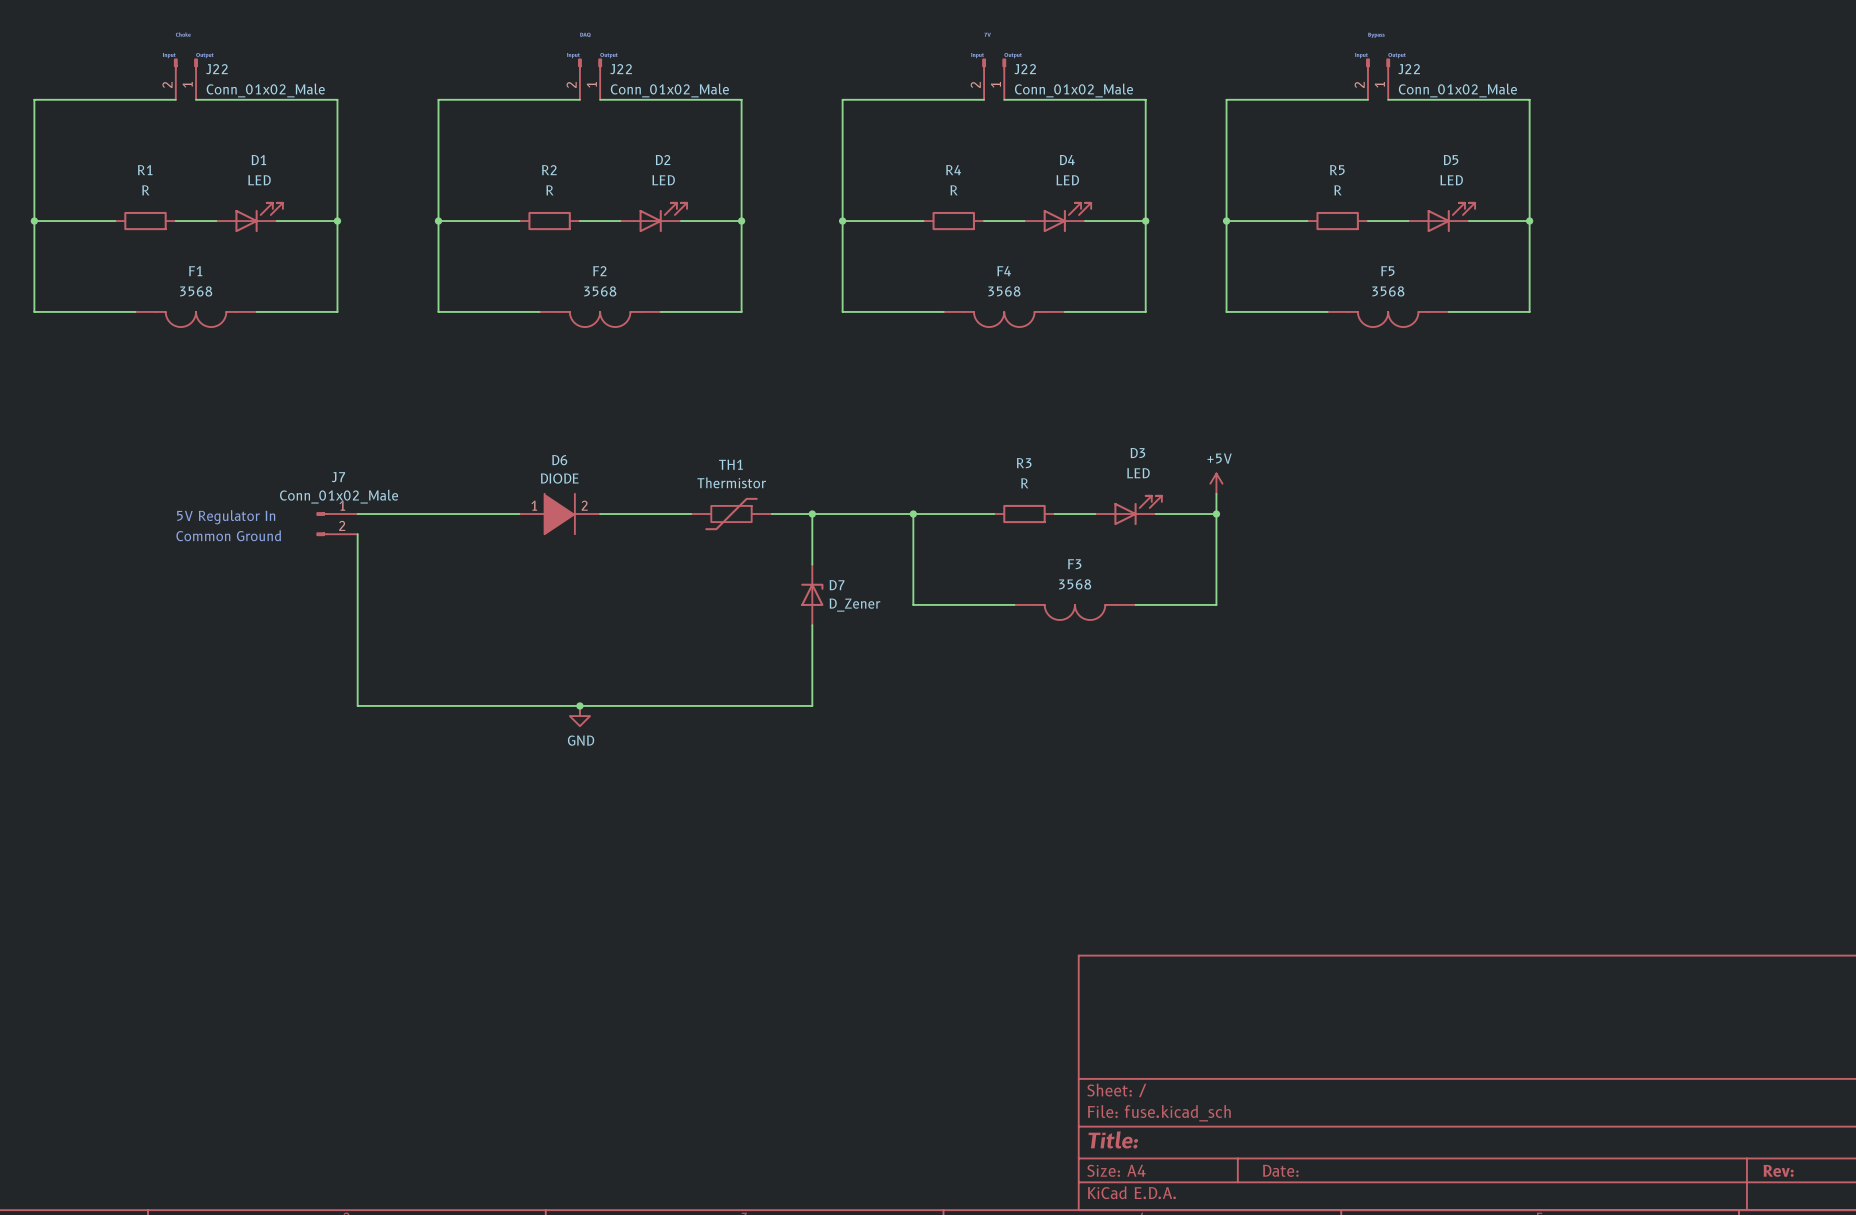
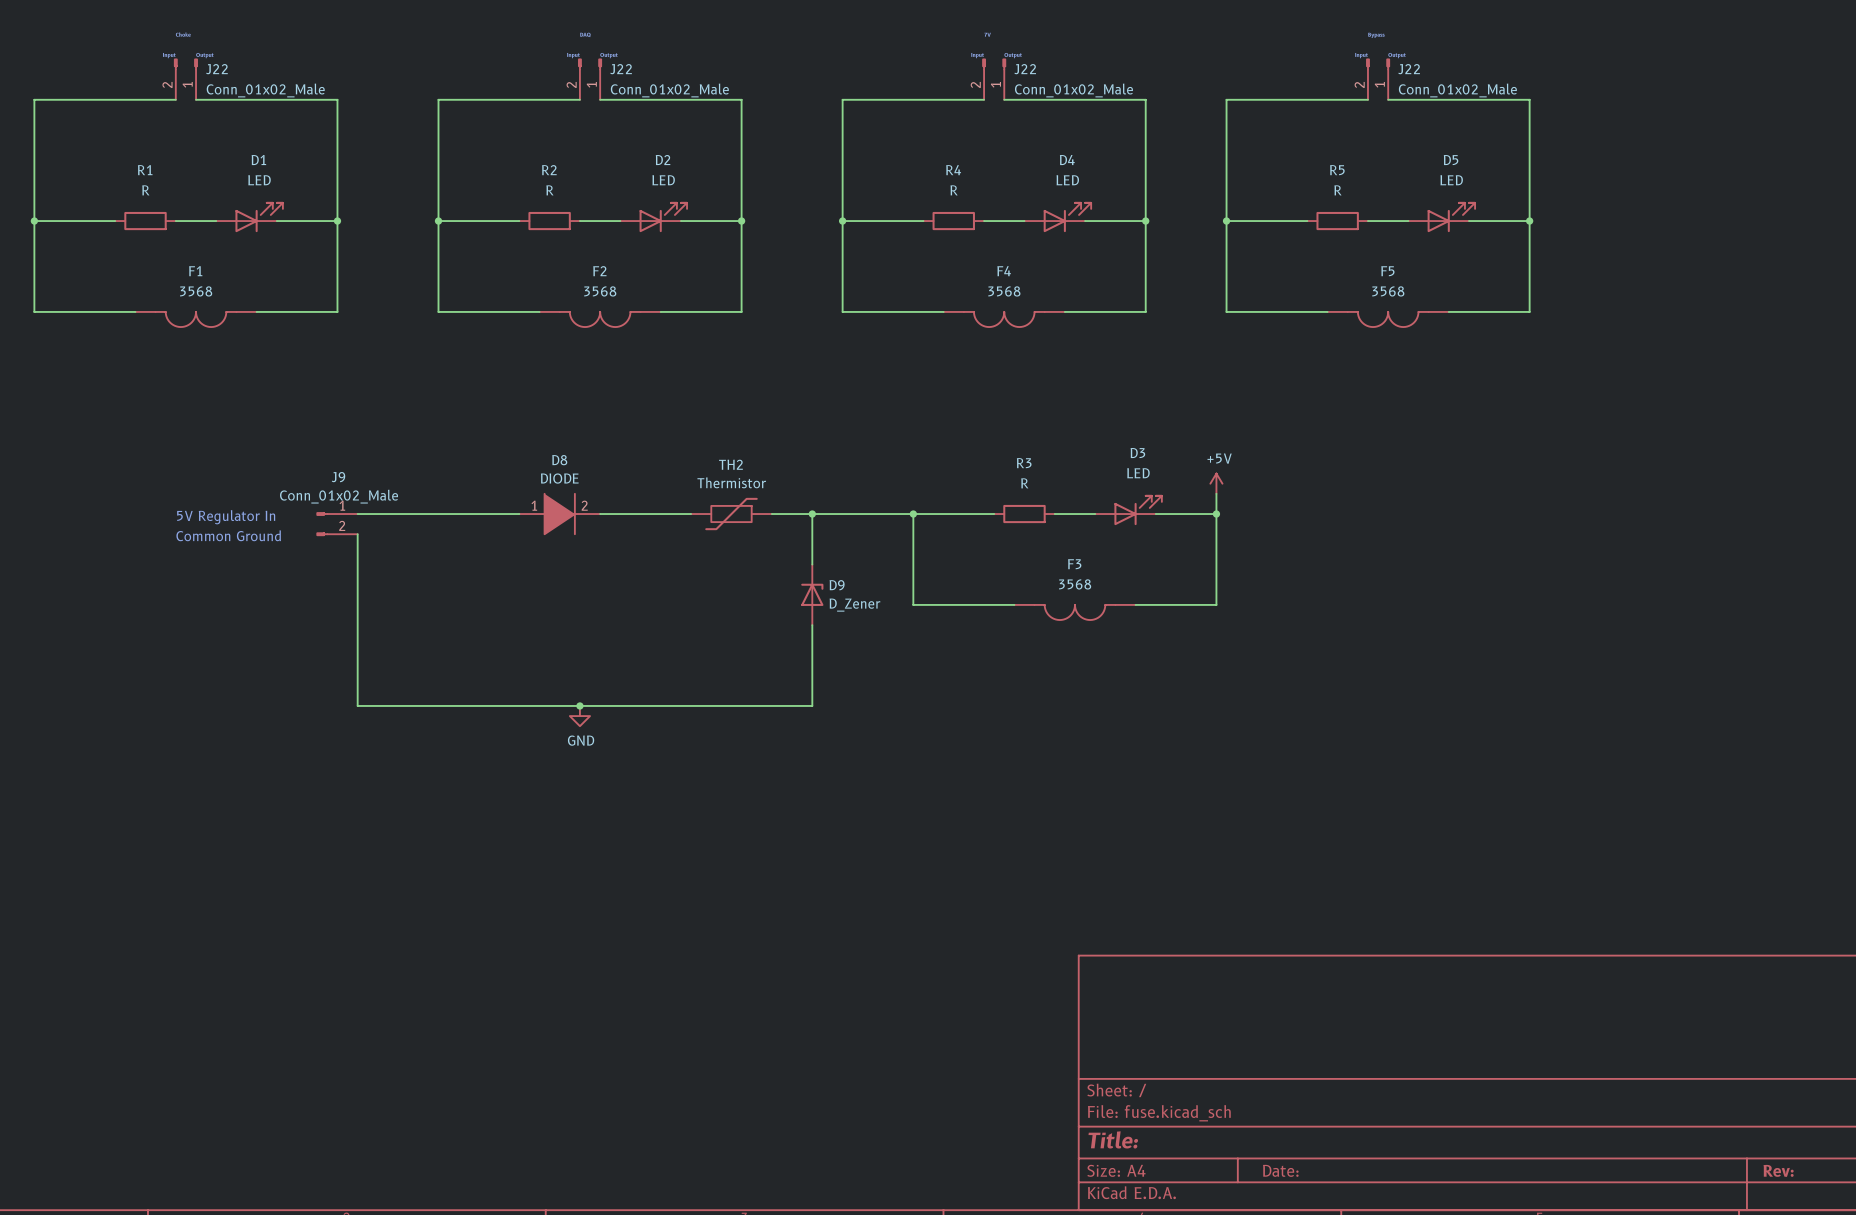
D6 name: D6 (559, 460) -> D8 (559, 460)
TH1 name: TH1 (730, 464) -> TH2 (730, 464)
J7 name: J7 (338, 477) -> J9 (338, 477)
D7 name: D7 (837, 585) -> D9 (837, 585)

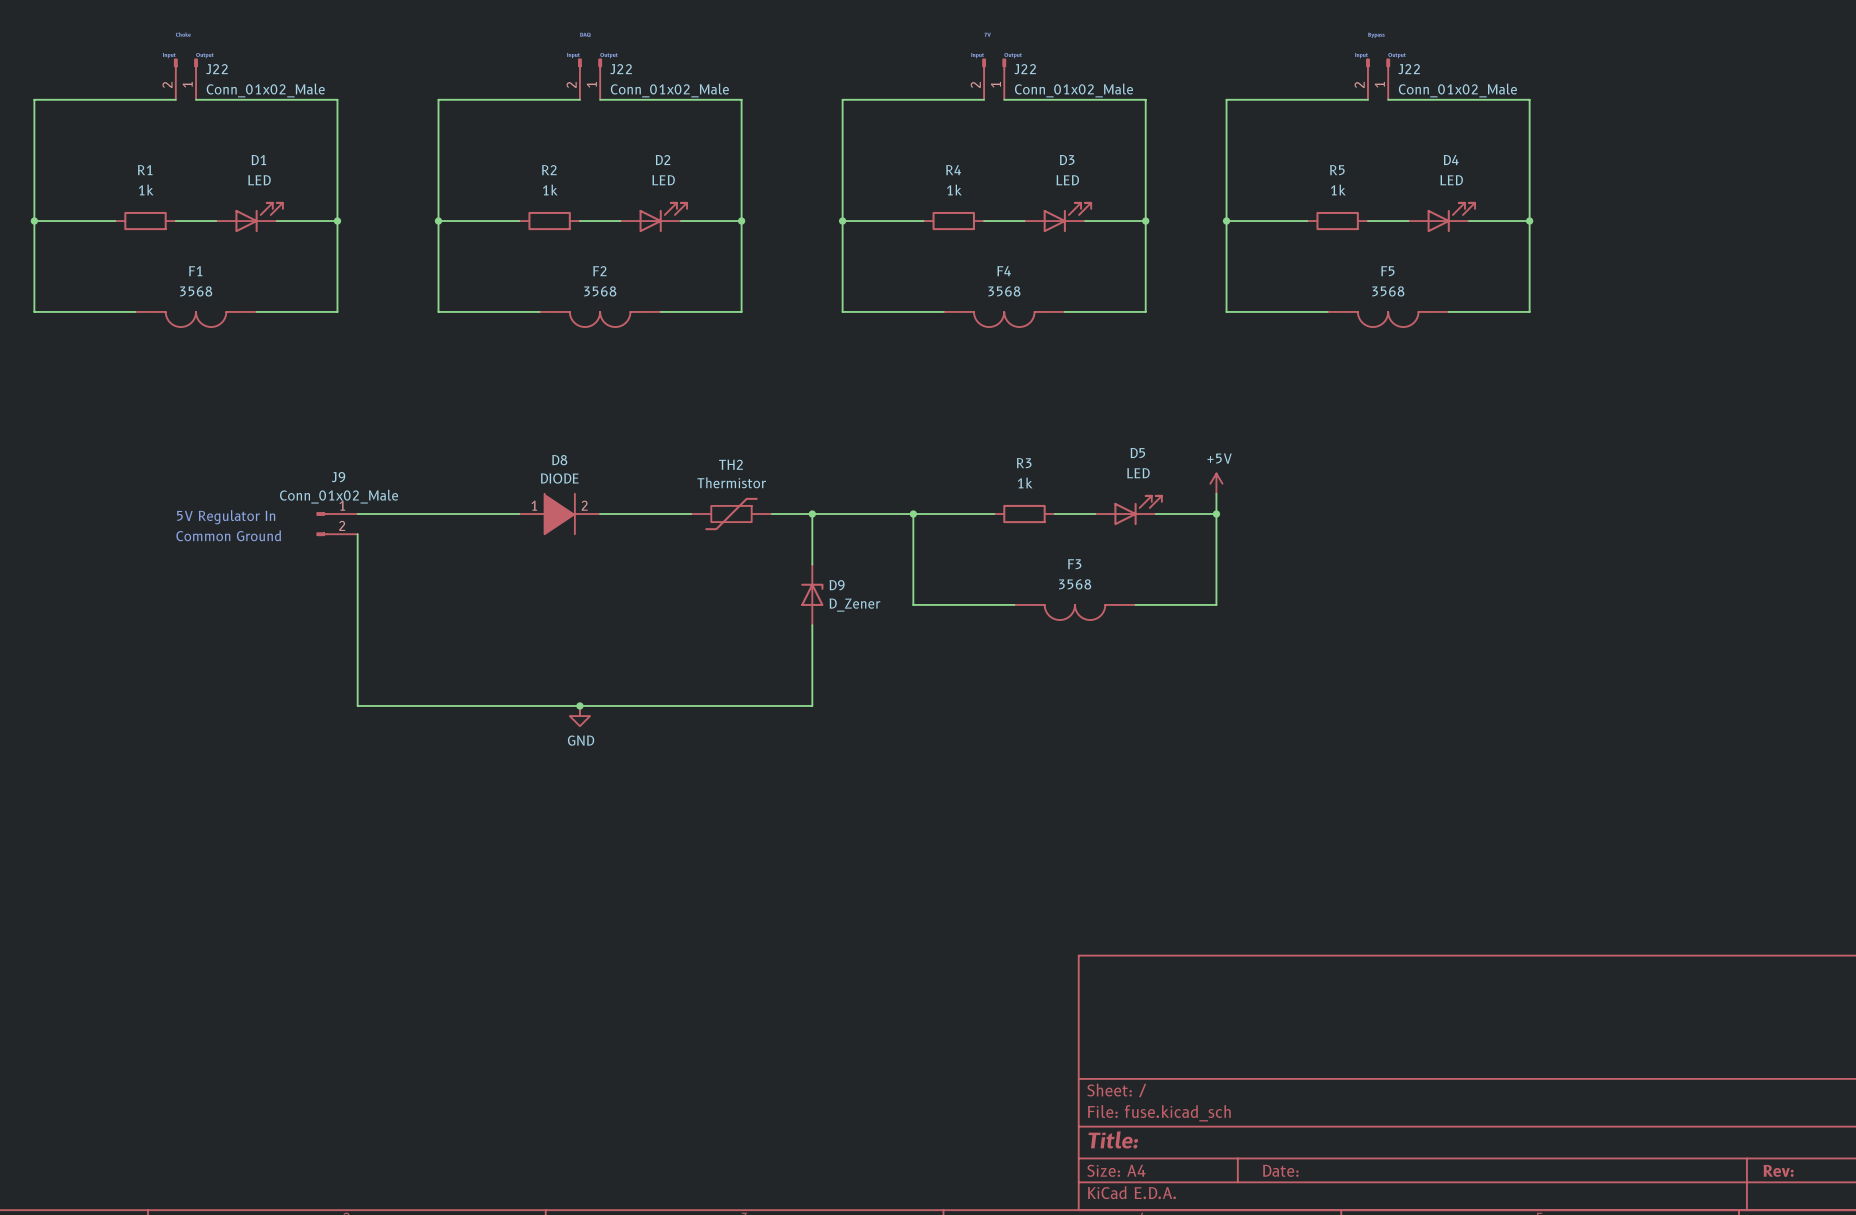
D4 name: D4 (1067, 160) -> D3 (1067, 160)
D5 name: D5 (1451, 160) -> D4 (1451, 160)
R1 value: R (145, 190) -> 1k (146, 190)
R2 value: R (549, 190) -> 1k (550, 190)
R4 value: R (954, 190) -> 1k (954, 190)
R5 value: R (1337, 190) -> 1k (1338, 190)
D3 name: D3 (1137, 453) -> D5 (1137, 453)
R3 value: R (1024, 483) -> 1k (1025, 483)

